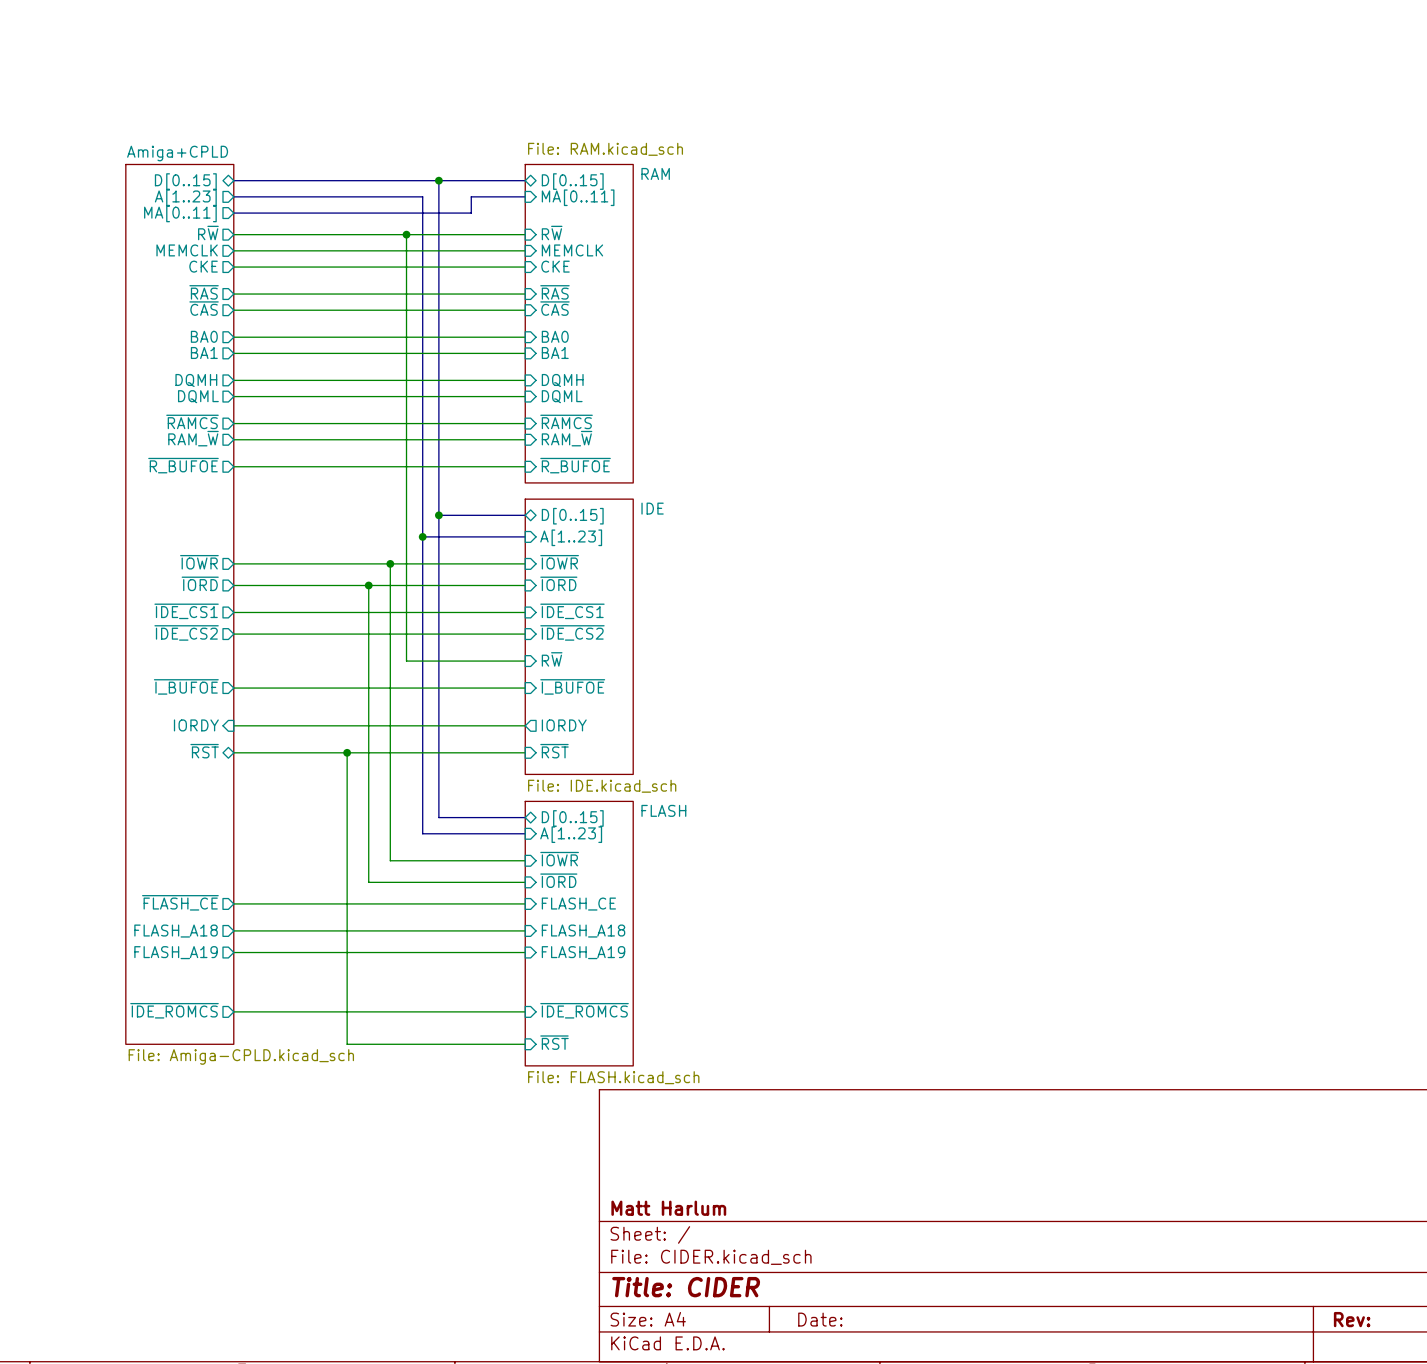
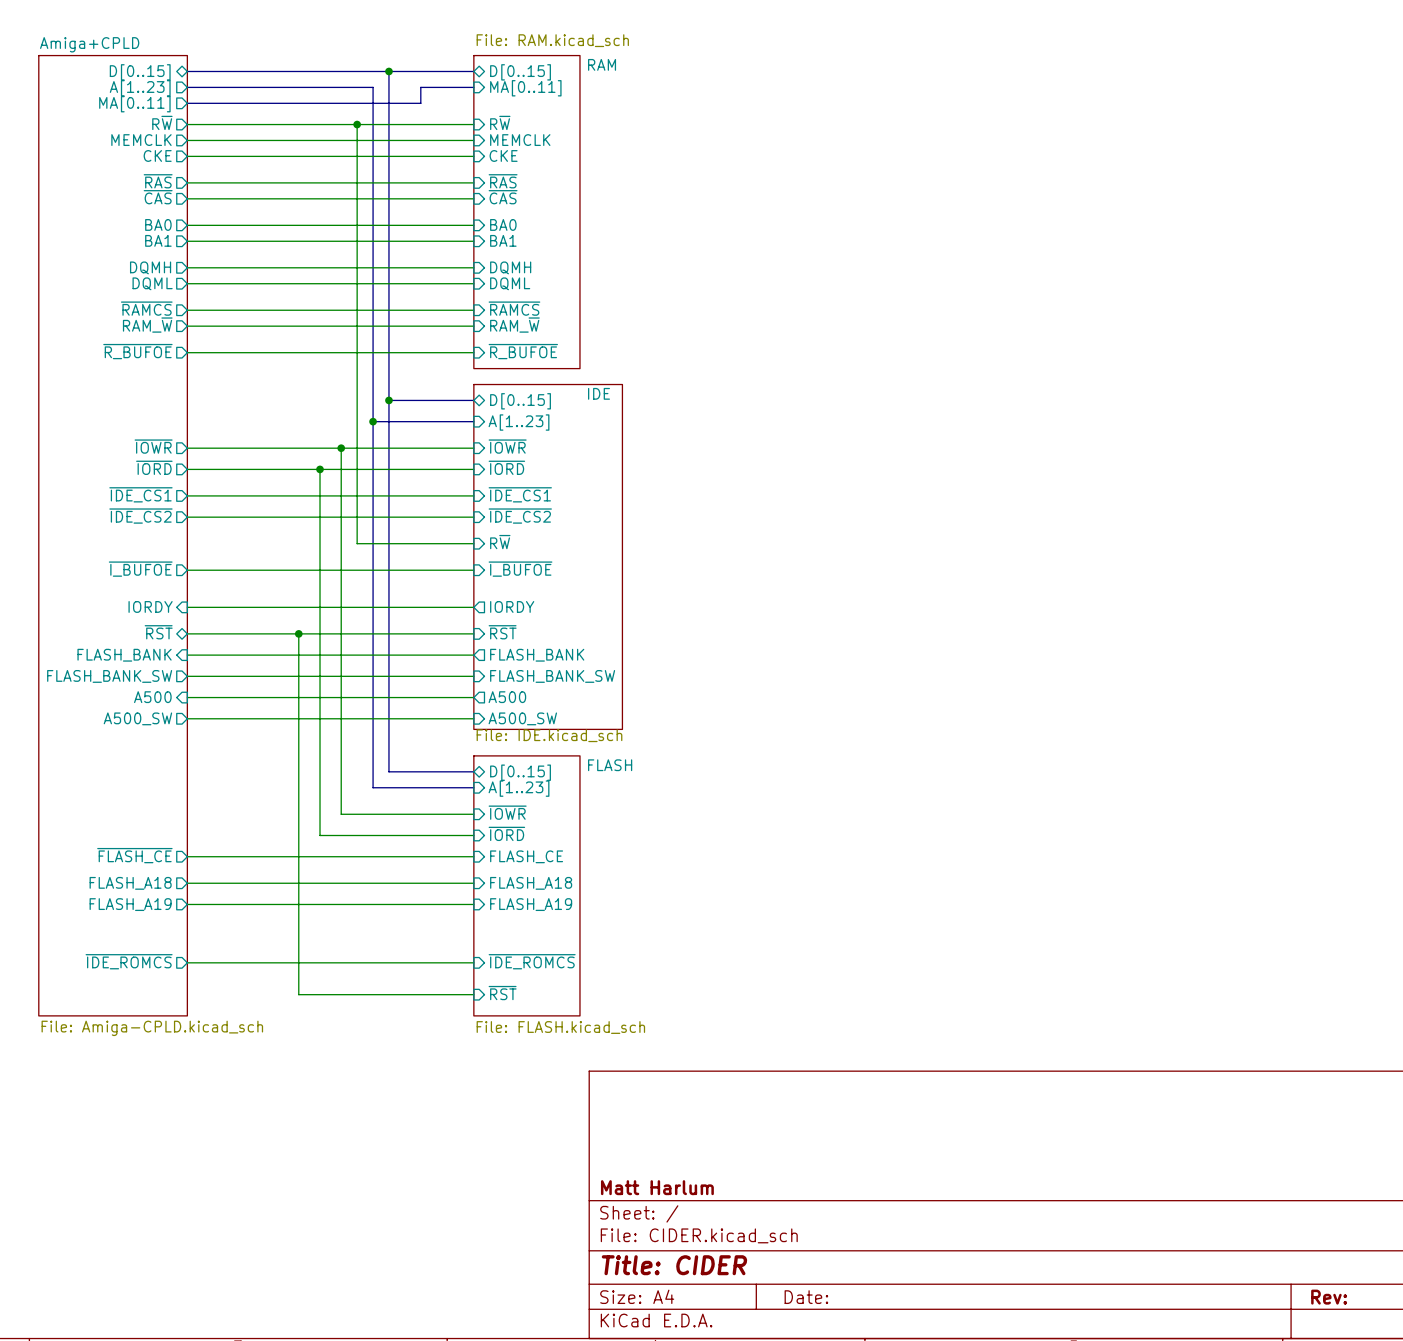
bus: none -> (388, 71) (388, 771) (473, 771)
junction: none -> (388, 71)
sheet pin: none -> D[0..15] (520, 72)
bus: none -> (187, 87) (373, 87) (373, 787) (473, 787)
junction: none -> (357, 124)
bus: (233, 180) (525, 180) -> (187, 71) (473, 71)
bus: (438, 180) (438, 817) (525, 817) -> none
junction: (438, 180) -> none
sheet pin position: D[0..15] (185, 181) -> D[0..15] (140, 72)
sheet pin: D[0..15] (572, 181) -> none
bus: (233, 196) (422, 196) (422, 833) (525, 833) -> none
bus: (525, 196) (471, 196) (471, 213) (233, 213) -> (473, 87) (420, 87) (420, 103) (187, 103)
sheet pin position: A[1..23] (185, 197) -> A[1..23] (140, 88)
sheet pin position: MA[0..11] (578, 197) -> MA[0..11] (525, 88)
sheet pin position: MA[0..11] (180, 213) -> MA[0..11] (134, 104)
sheet pin position: R~{W} (208, 233) -> R~{W} (162, 122)
sheet pin position: R~{W} (552, 233) -> R~{W} (500, 122)
wire: (233, 234) (525, 234) -> (187, 124) (473, 124)
wire: (406, 234) (406, 661) (525, 661) -> (357, 124) (357, 543) (473, 543)
junction: (406, 234) -> none
sheet pin position: MEMCLK (187, 250) -> MEMCLK (141, 140)
wire: (233, 250) (525, 250) -> (187, 140) (473, 140)
sheet pin position: MEMCLK (572, 250) -> MEMCLK (520, 140)
sheet pin position: CKE (203, 266) -> CKE (157, 155)
sheet pin position: CKE (555, 266) -> CKE (503, 155)
wire: (233, 267) (525, 267) -> (187, 156) (473, 156)
sheet pin position: ~{RAS} (204, 292) -> ~{RAS} (158, 181)
sheet pin position: ~{RAS} (554, 292) -> ~{RAS} (503, 181)
wire: (233, 294) (525, 294) -> (187, 182) (473, 182)
sheet pin position: ~{CAS} (204, 308) -> ~{CAS} (158, 197)
sheet pin position: ~{CAS} (554, 308) -> ~{CAS} (503, 197)
wire: (233, 310) (525, 310) -> (187, 198) (473, 198)
sheet RAM position: (579, 323) -> (526, 212)
sheet pin position: BA0 (204, 336) -> BA0 (158, 224)
sheet pin position: BA0 (555, 336) -> BA0 (503, 224)
wire: (233, 337) (525, 337) -> (187, 225) (473, 225)
sheet pin position: BA1 (204, 352) -> BA1 (158, 240)
sheet pin position: BA1 (555, 352) -> BA1 (503, 240)
wire: (233, 353) (525, 353) -> (187, 241) (473, 241)
sheet pin position: DQMH (196, 380) -> DQMH (150, 267)
wire: (233, 380) (525, 380) -> (187, 267) (473, 267)
sheet pin position: DQMH (562, 380) -> DQMH (510, 267)
sheet pin position: DQML (198, 396) -> DQML (152, 283)
wire: (233, 396) (525, 396) -> (187, 283) (473, 283)
sheet pin position: DQML (562, 396) -> DQML (510, 283)
junction: none -> (388, 400)
sheet pin: none -> D[0..15] (520, 401)
sheet pin position: ~{RAMCS} (192, 421) -> ~{RAMCS} (146, 308)
sheet pin position: ~{RAMCS} (566, 421) -> ~{RAMCS} (514, 308)
wire: (233, 423) (525, 423) -> (187, 310) (473, 310)
junction: none -> (373, 421)
sheet pin position: RAM_~{W} (193, 438) -> RAM_~{W} (147, 325)
sheet pin position: RAM_~{W} (567, 438) -> RAM_~{W} (514, 325)
wire: (233, 439) (525, 439) -> (187, 326) (473, 326)
wire: none -> (341, 448) (341, 739)
junction: none -> (341, 448)
sheet pin position: ~{R_BUFOE} (183, 465) -> ~{R_BUFOE} (137, 351)
sheet pin position: ~{R_BUFOE} (575, 465) -> ~{R_BUFOE} (523, 351)
wire: (233, 466) (525, 466) -> (187, 352) (473, 352)
wire: none -> (320, 469) (320, 835) (473, 835)
junction: none -> (320, 469)
bus: (438, 515) (525, 515) -> (388, 400) (473, 400)
junction: (438, 515) -> none
sheet pin: D[0..15] (572, 516) -> none
bus: (422, 536) (525, 536) -> (373, 421) (473, 421)
junction: (422, 536) -> none
sheet pin position: A[1..23] (571, 537) -> A[1..23] (519, 422)
sheet Amiga+CPLD: none -> File: Amiga-CPLD.kicad_sch (113, 535)
sheet pin position: ~{IOWR} (199, 562) -> ~{IOWR} (153, 446)
sheet pin position: ~{IOWR} (559, 562) -> ~{IOWR} (507, 446)
wire: (233, 563) (525, 563) -> (187, 448) (473, 448)
wire: (390, 563) (390, 860) (525, 860) -> none
junction: (390, 563) -> none
sheet IDE: none -> File: IDE.kicad_sch (548, 556)
wire: none -> (187, 570) (473, 570)
sheet pin position: ~{IORD} (200, 583) -> ~{IORD} (154, 467)
sheet pin position: ~{IORD} (558, 583) -> ~{IORD} (506, 467)
wire: (233, 585) (525, 585) -> (187, 469) (473, 469)
wire: (368, 585) (368, 882) (525, 882) -> none
junction: (368, 585) -> none
sheet Amiga+CPLD: File: Amiga-CPLD.kicad_sch (179, 604) -> none
sheet pin position: ~{IDE_CS1} (186, 611) -> ~{IDE_CS1} (140, 494)
sheet pin position: ~{IDE_CS1} (572, 611) -> ~{IDE_CS1} (520, 494)
wire: (233, 612) (525, 612) -> (187, 495) (473, 495)
sheet pin position: ~{IDE_CS2} (186, 632) -> ~{IDE_CS2} (140, 516)
sheet pin position: ~{IDE_CS2} (572, 632) -> ~{IDE_CS2} (520, 516)
wire: (233, 634) (525, 634) -> (187, 517) (473, 517)
sheet IDE: File: IDE.kicad_sch (579, 636) -> none
junction: none -> (298, 633)
sheet pin position: R~{W} (552, 659) -> R~{W} (500, 542)
sheet pin: none -> FLASH_BANK (124, 655)
wire: none -> (187, 655) (473, 655)
sheet pin: none -> FLASH_BANK (537, 655)
sheet pin position: ~{I_BUFOE} (186, 686) -> ~{I_BUFOE} (140, 569)
sheet pin position: ~{I_BUFOE} (572, 686) -> ~{I_BUFOE} (520, 569)
sheet pin: none -> FLASH_BANK_SW (109, 676)
wire: none -> (187, 676) (229, 676)
wire: (482, 688) (525, 688) -> none
sheet pin: none -> FLASH_BANK_SW (552, 676)
sheet pin: none -> A500 (152, 697)
sheet pin: none -> A500 (507, 697)
sheet pin position: IORDY (196, 725) -> IORDY (150, 606)
wire: (233, 725) (525, 725) -> (187, 607) (473, 607)
sheet pin position: IORDY (564, 725) -> IORDY (512, 606)
sheet pin: none -> A500_SW (137, 718)
wire: none -> (187, 718) (473, 718)
sheet pin: none -> A500_SW (522, 718)
sheet pin position: ~{RST} (204, 751) -> ~{RST} (158, 632)
sheet pin position: ~{RST} (554, 751) -> ~{RST} (502, 632)
wire: (233, 752) (525, 752) -> (187, 633) (473, 633)
junction: (347, 752) -> none
sheet pin position: D[0..15] (572, 818) -> D[0..15] (520, 772)
wire: (347, 828) (347, 1044) (525, 1044) -> (341, 814) (473, 814)
sheet pin position: A[1..23] (571, 834) -> A[1..23] (519, 788)
sheet pin position: ~{IOWR} (559, 859) -> ~{IOWR} (507, 812)
sheet pin position: ~{IORD} (558, 880) -> ~{IORD} (506, 833)
sheet pin position: ~{FLASH_CE} (180, 902) -> ~{FLASH_CE} (134, 855)
wire: (233, 903) (525, 903) -> (187, 697) (473, 697)
sheet pin position: FLASH_CE (578, 904) -> FLASH_CE (526, 856)
wire: none -> (187, 904) (473, 904)
wire: (233, 930) (525, 930) -> (187, 883) (473, 883)
sheet pin position: FLASH_A18 (176, 931) -> FLASH_A18 (130, 883)
sheet pin position: FLASH_A18 (583, 931) -> FLASH_A18 (531, 883)
sheet FLASH position: (579, 933) -> (526, 885)
sheet pin position: FLASH_A19 (176, 952) -> FLASH_A19 (130, 904)
wire: (233, 952) (525, 952) -> (187, 856) (473, 856)
sheet pin position: FLASH_A19 (583, 952) -> FLASH_A19 (531, 904)
wire: none -> (187, 962) (473, 962)
sheet pin position: ~{IDE_ROMCS} (174, 1010) -> ~{IDE_ROMCS} (129, 961)
sheet pin position: ~{IDE_ROMCS} (584, 1010) -> ~{IDE_ROMCS} (532, 961)
wire: (233, 1011) (303, 1011) -> (298, 633) (298, 994)
wire: (482, 1011) (525, 1011) -> none
sheet pin position: ~{RST} (554, 1042) -> ~{RST} (502, 993)

